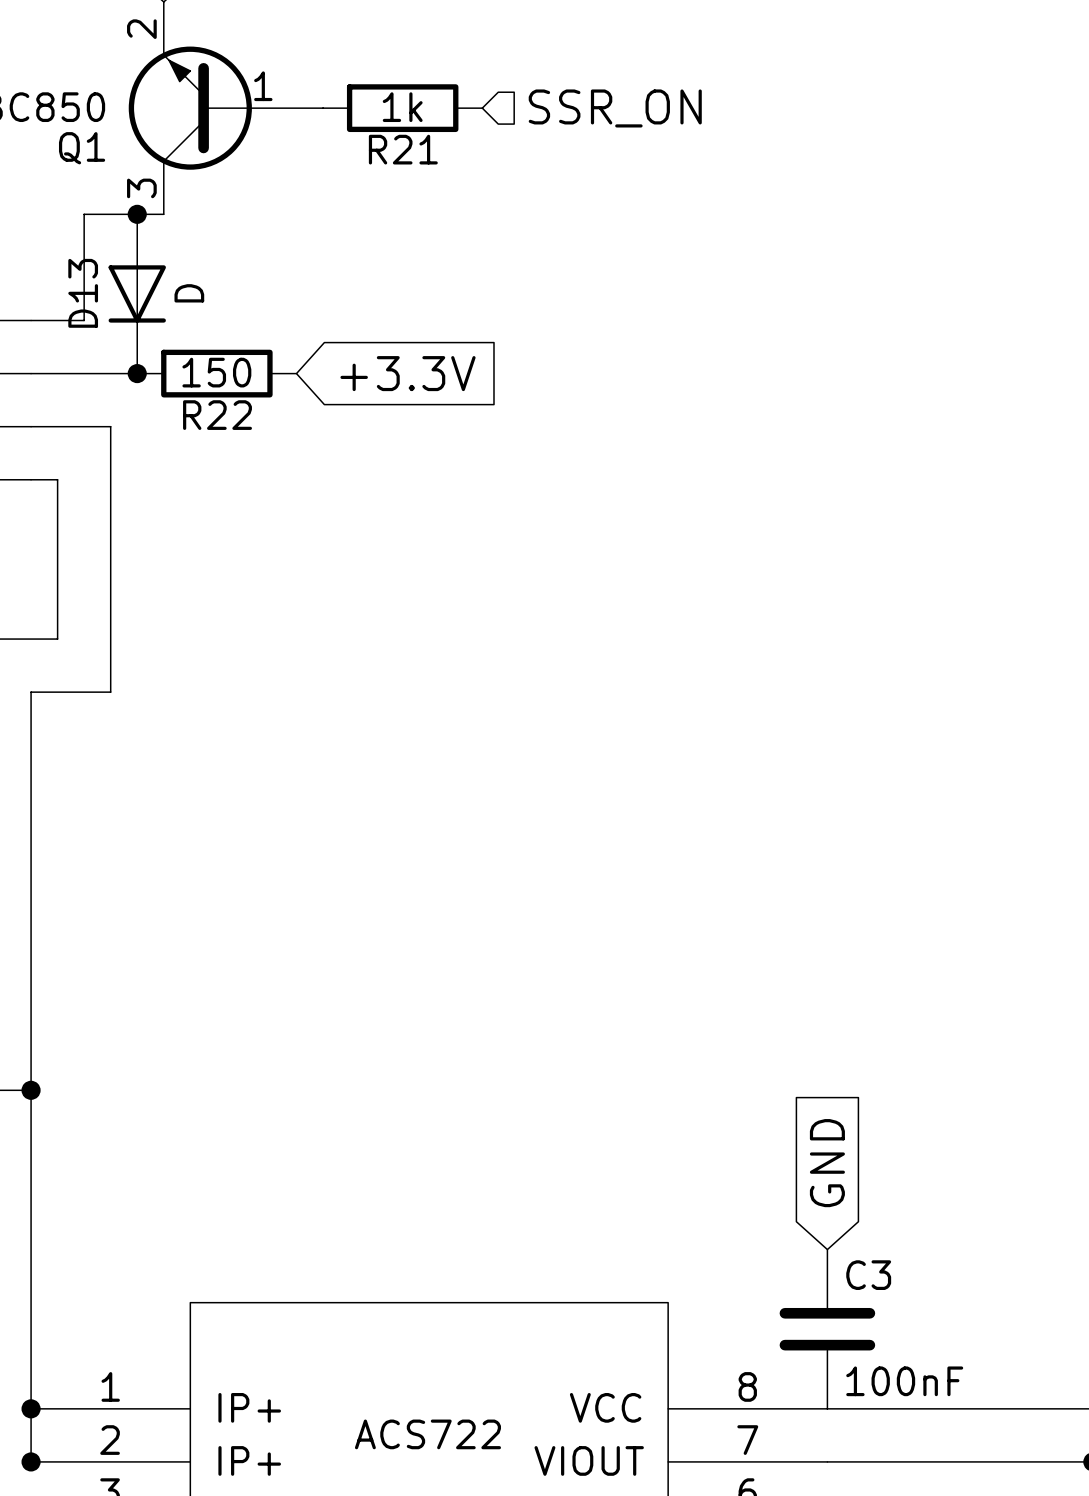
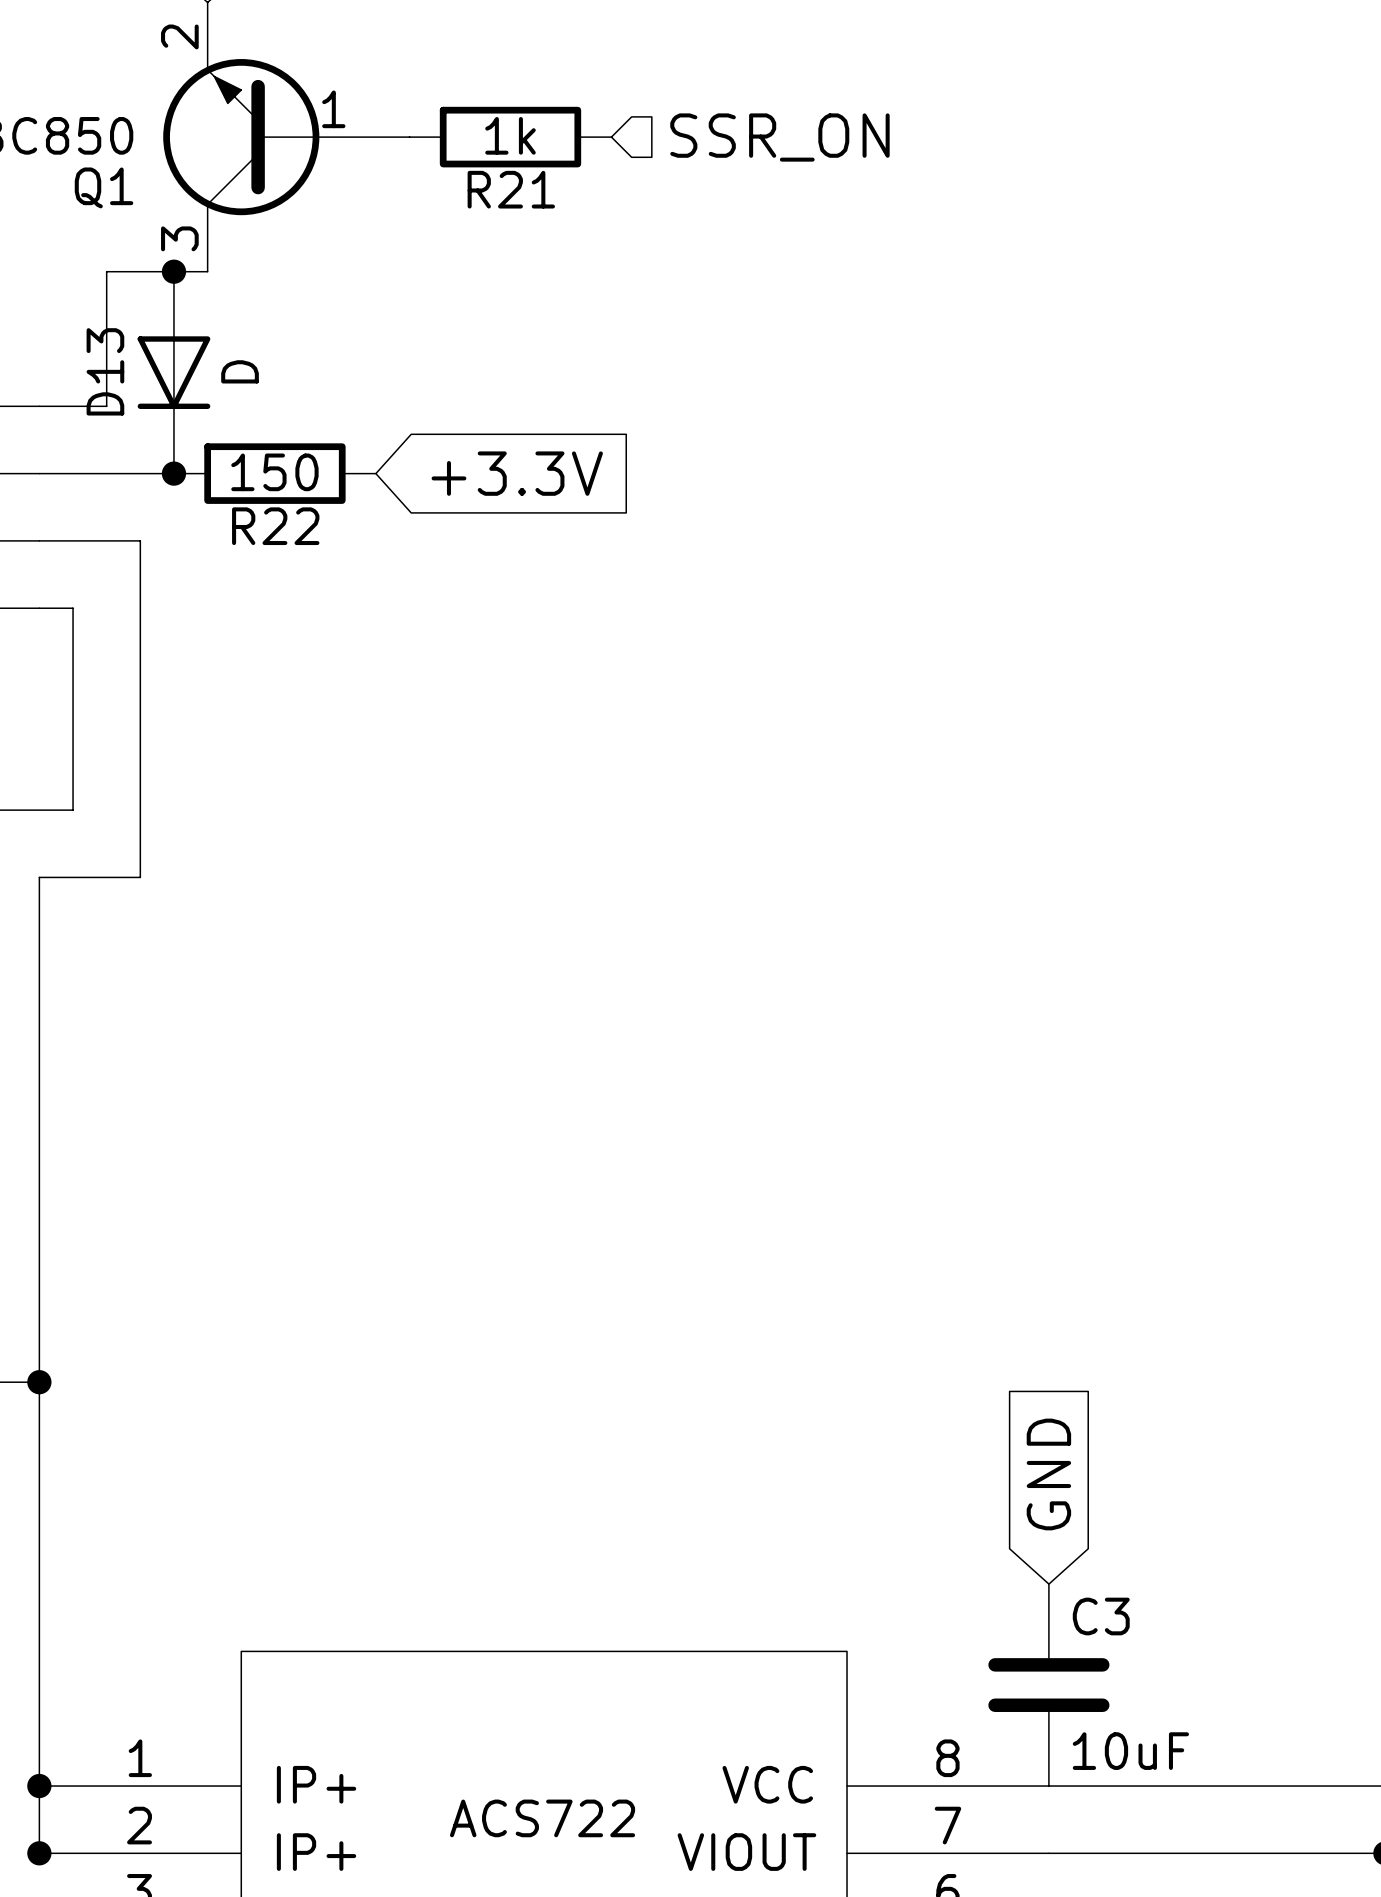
C3 value: 100nF (904, 1381) -> 10uF (1130, 1751)

